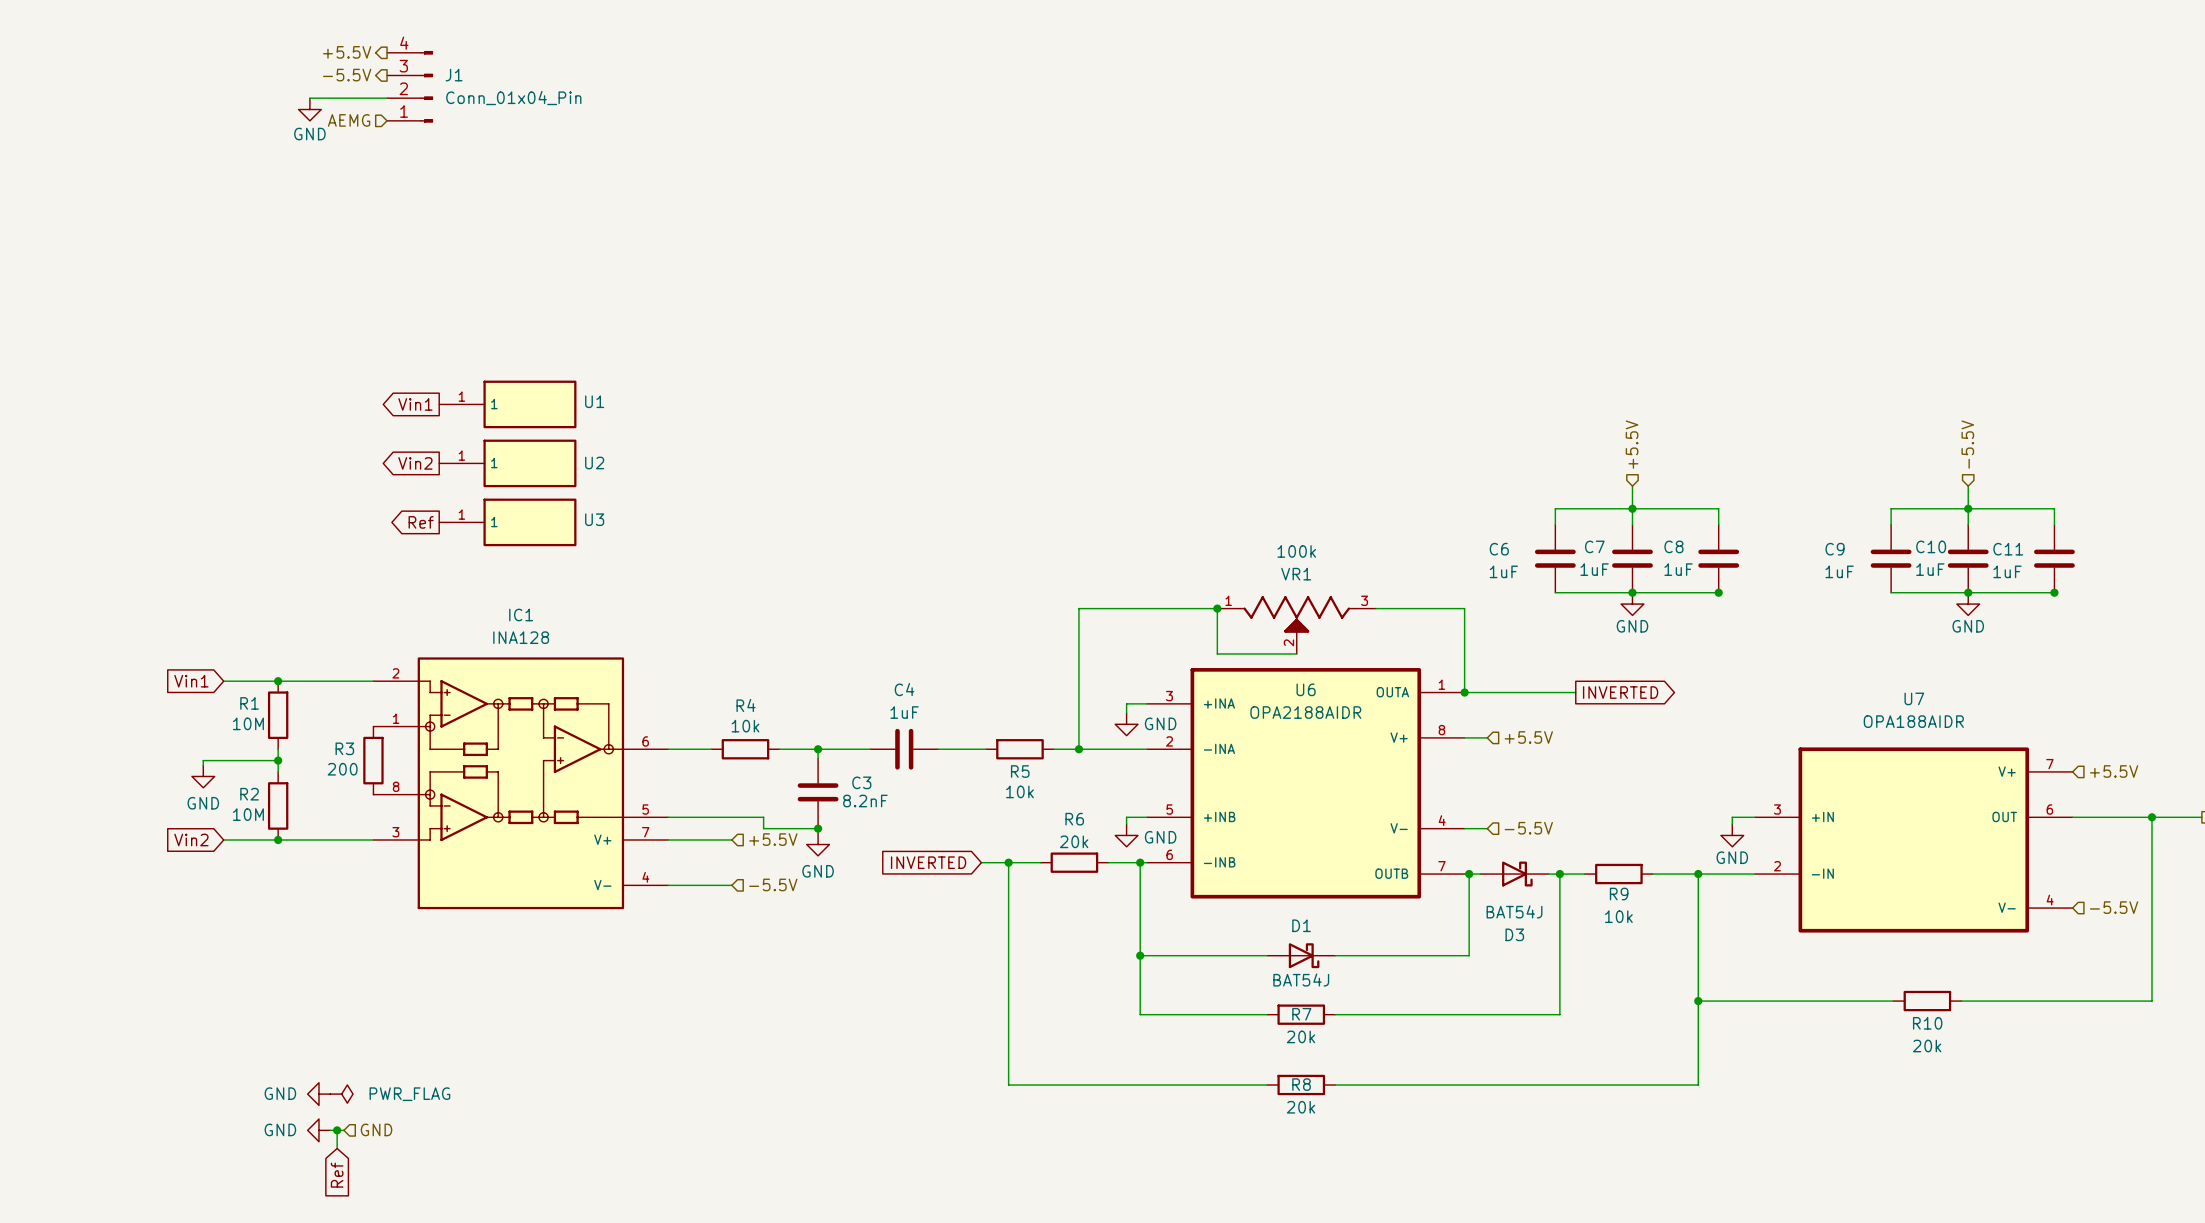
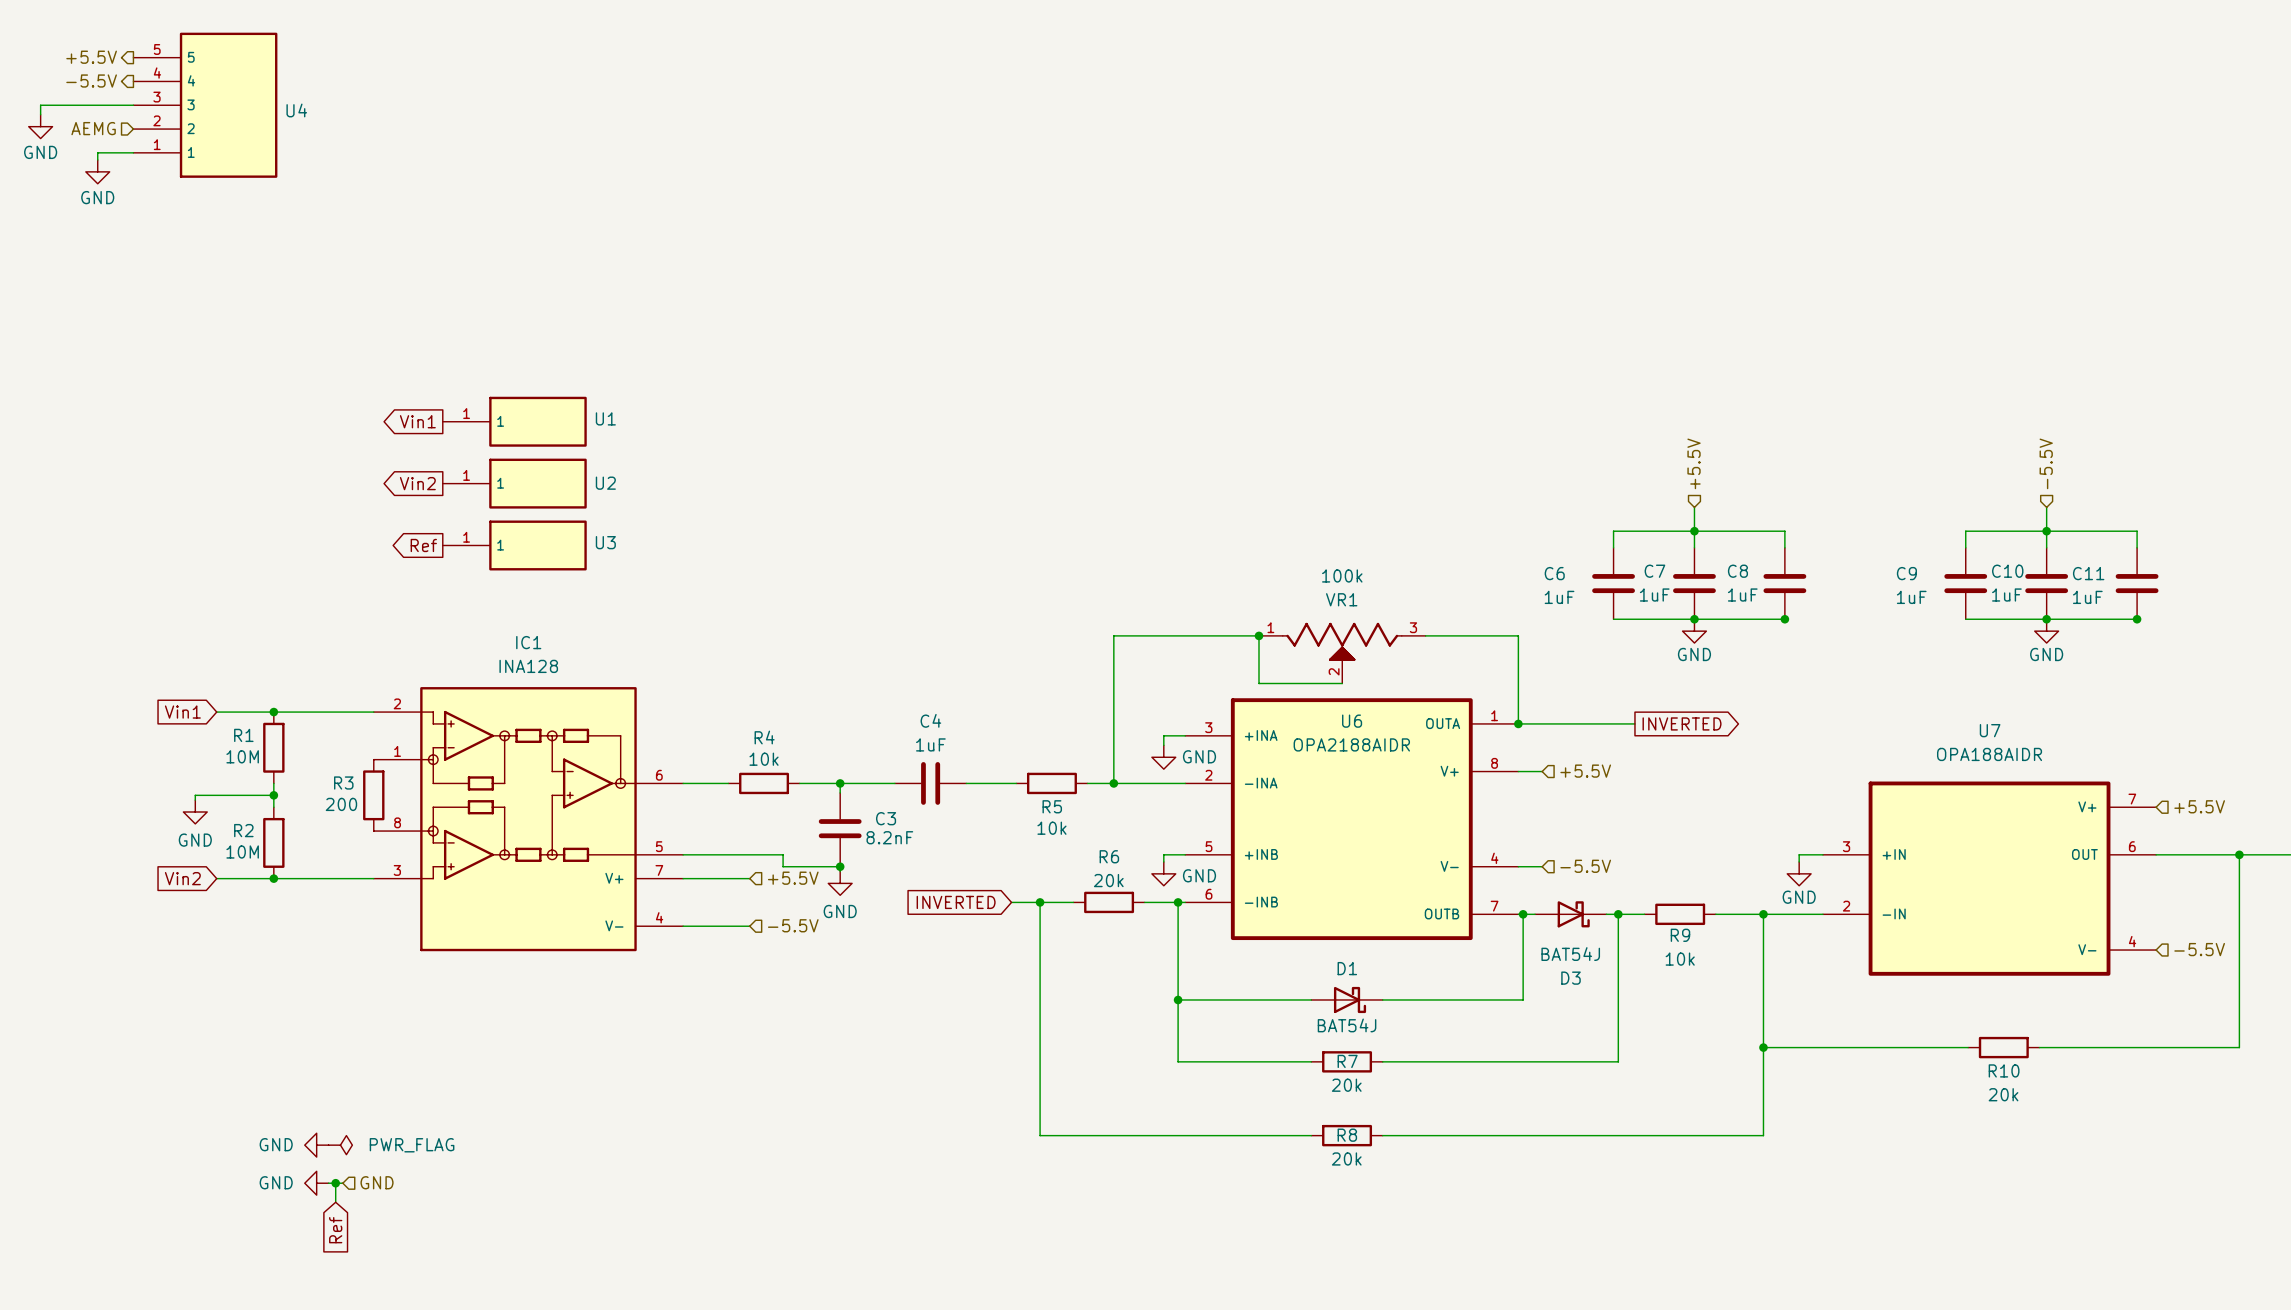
hierarchical label: +5.5V (347, 52) -> none
hierarchical label: none -> +5.5V (91, 57)
hierarchical label: -5.5V (347, 75) -> none
hierarchical label: none -> -5.5V (91, 81)
J1: Conn_01x04_Pin (410, 86) -> none
wire: (309, 98) (387, 98) -> none
wire: none -> (133, 105) (40, 105) (40, 114)
U4: none -> (205, 105)
power symbol: GND (309, 109) -> none
hierarchical label: AEMG (349, 120) -> none
power symbol: none -> GND (40, 126)
hierarchical label: none -> AEMG (93, 128)
wire: none -> (133, 152) (97, 152) (97, 159)
power symbol: none -> GND (97, 171)

